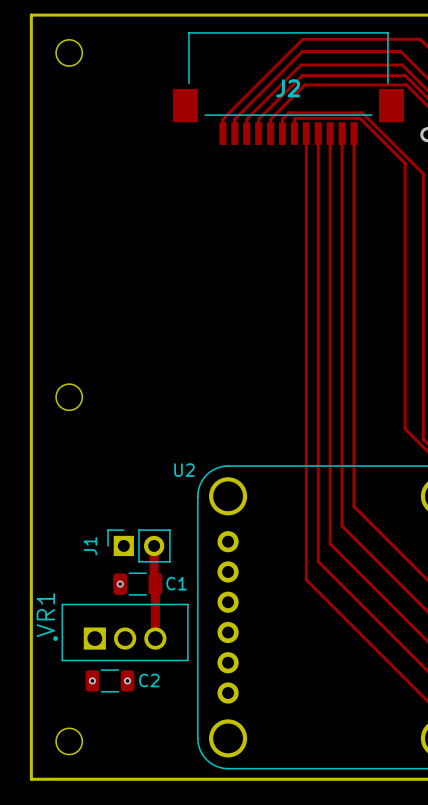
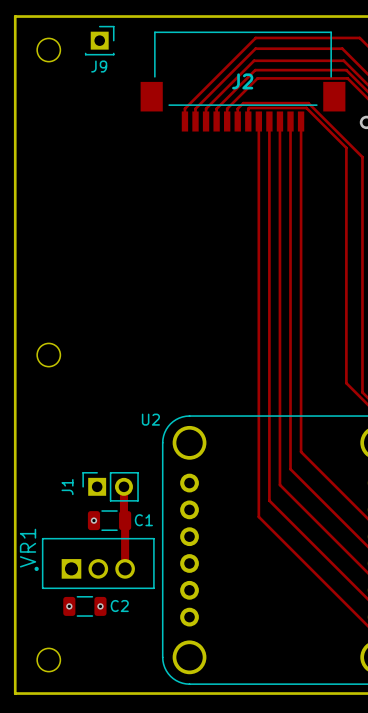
J9: none -> (99, 40)

